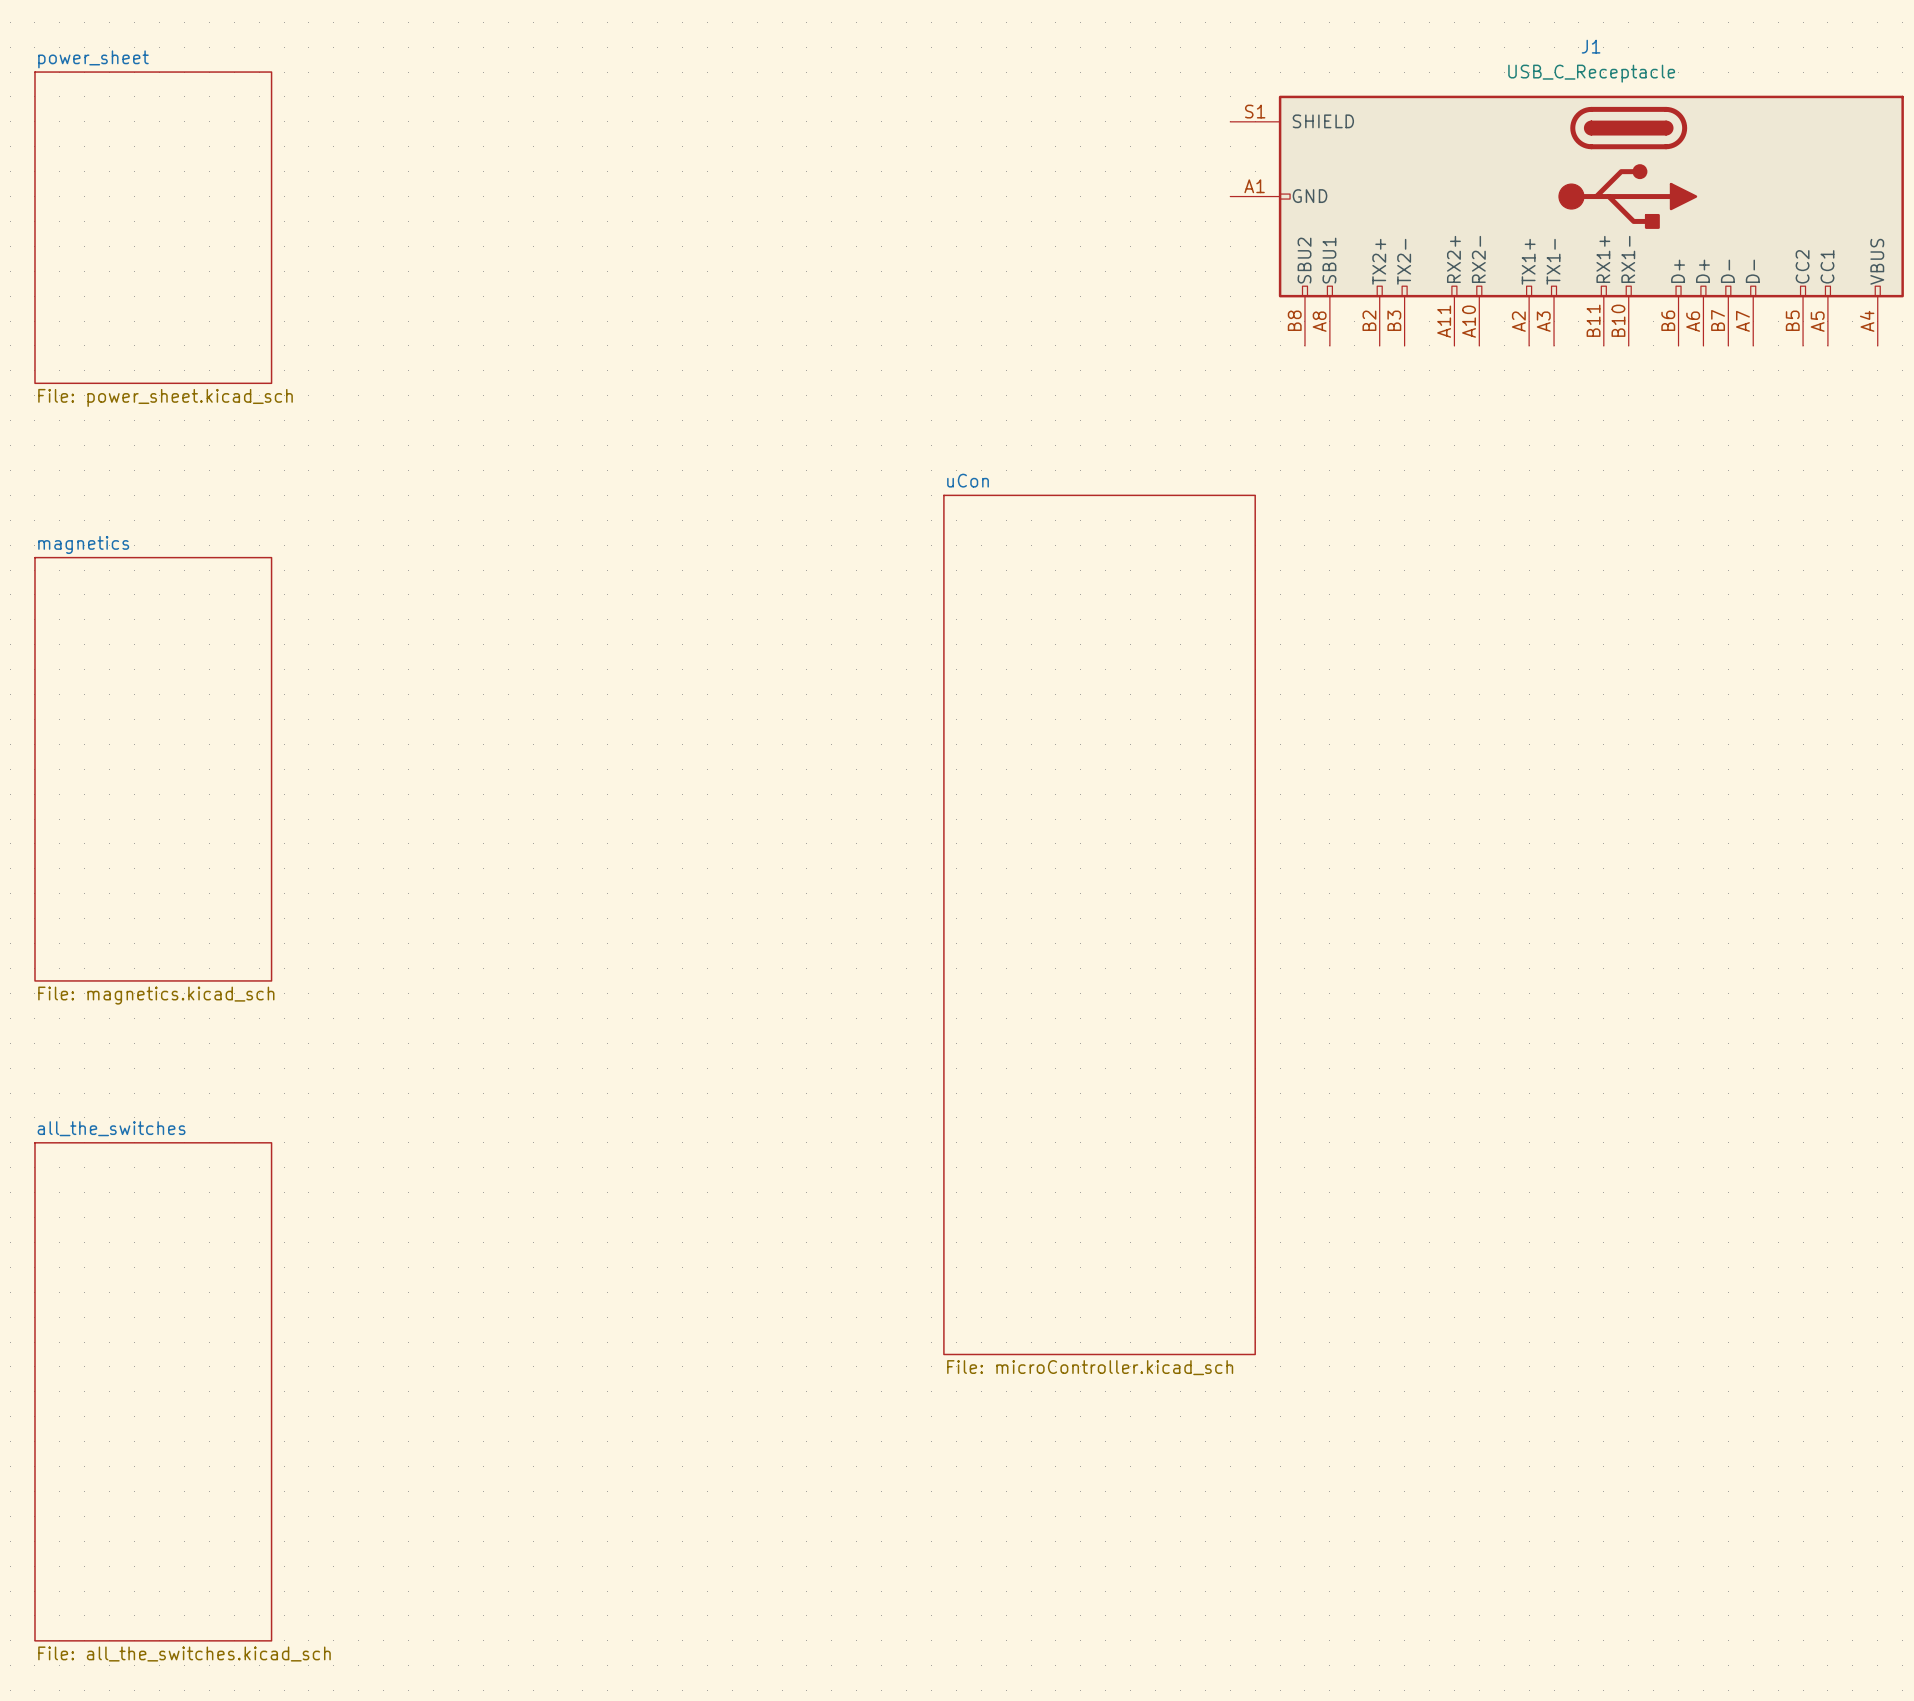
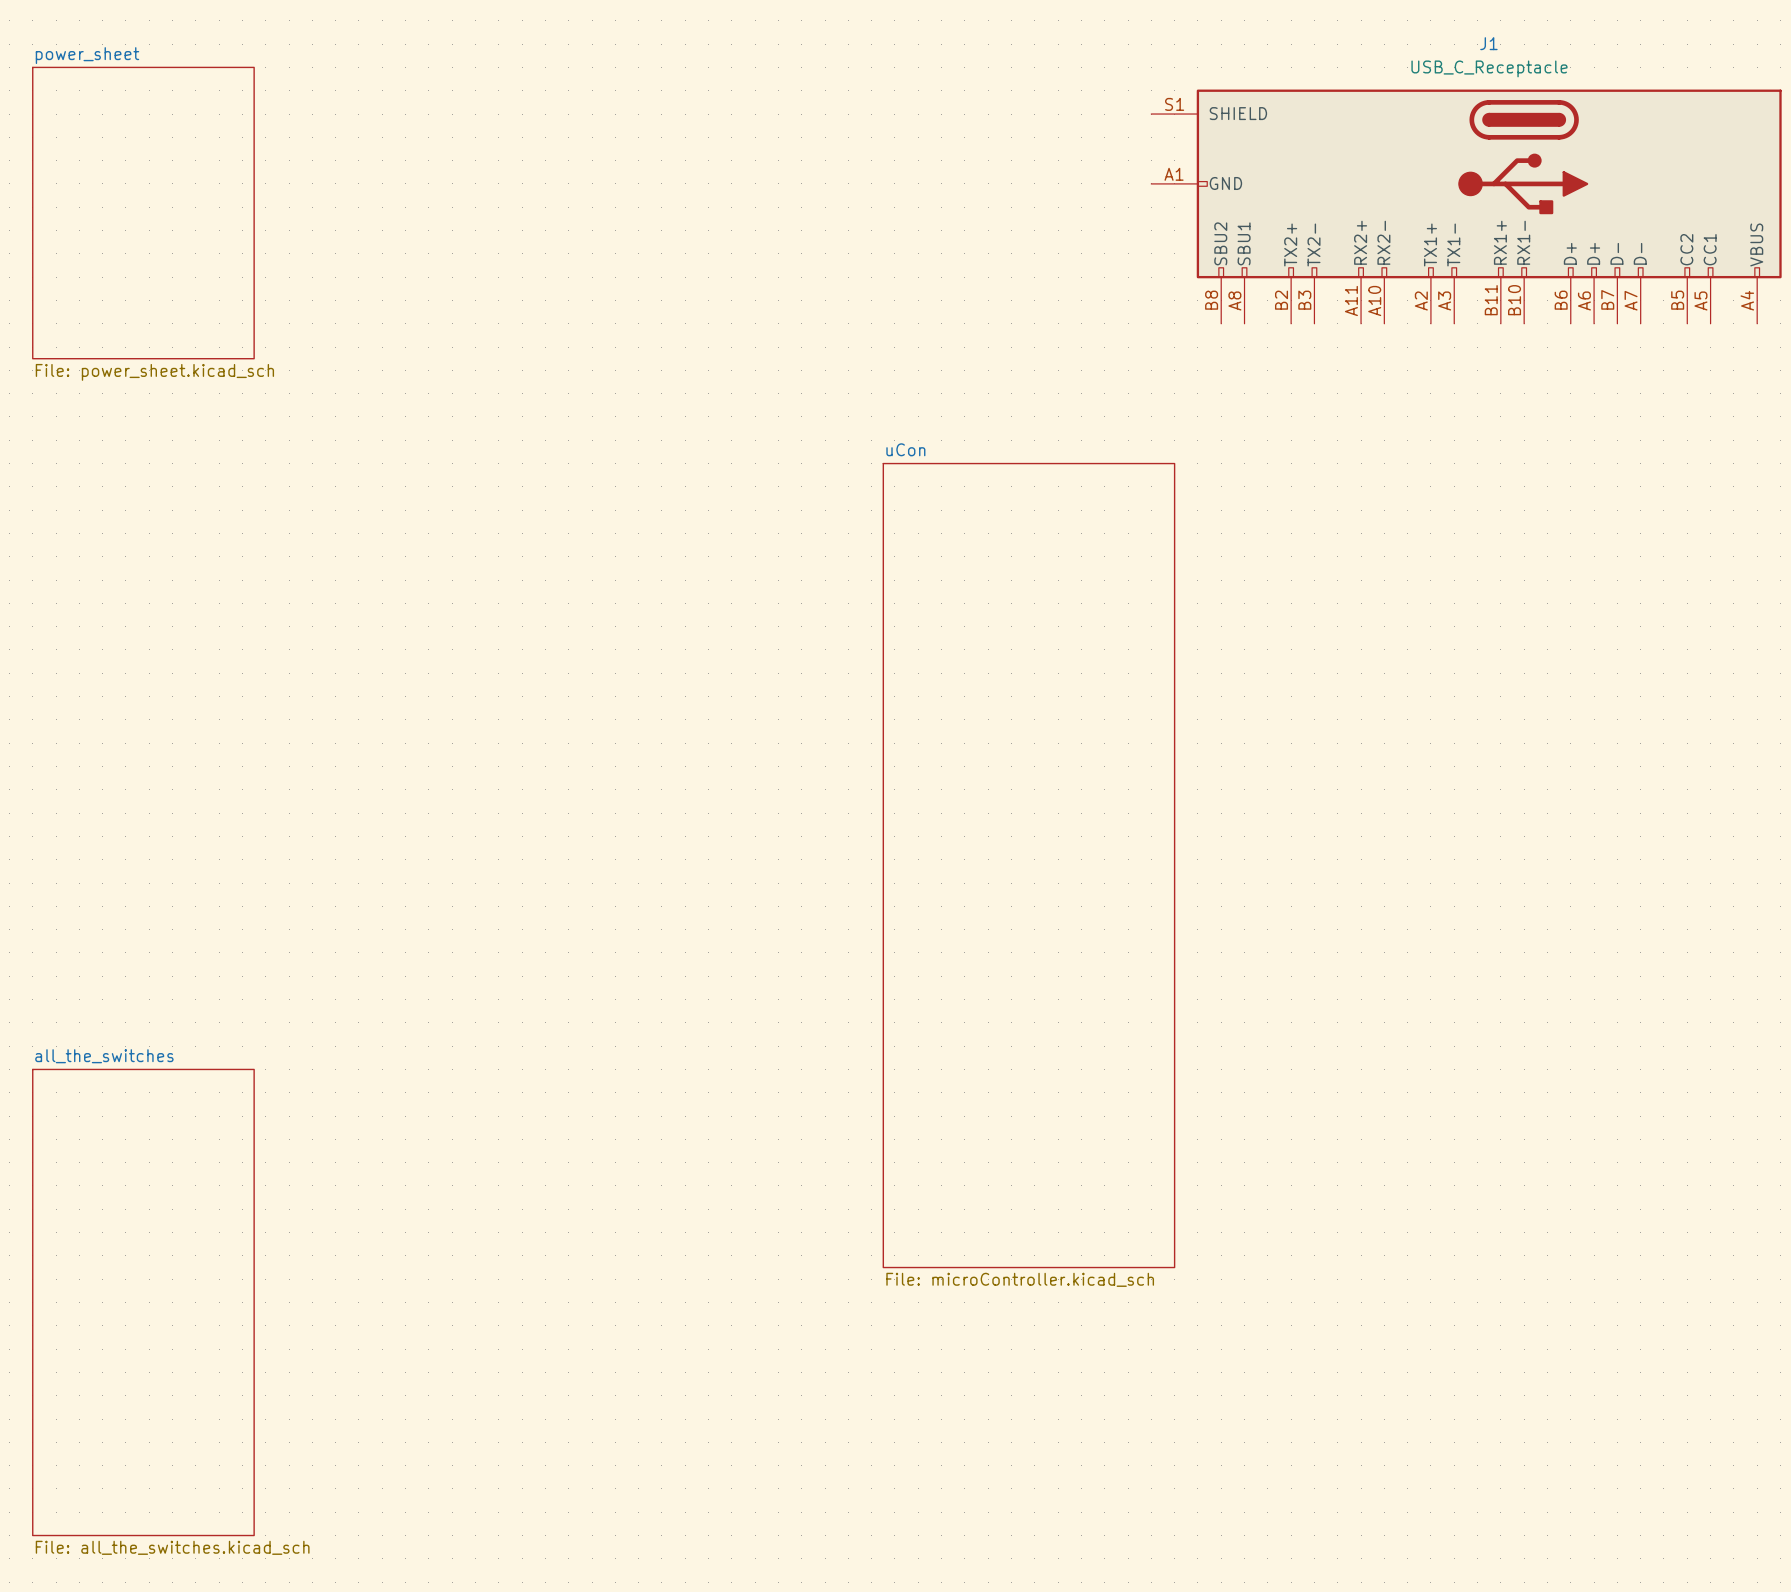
sheet magnetics: File: magnetics.kicad_sch (153, 769) -> none

